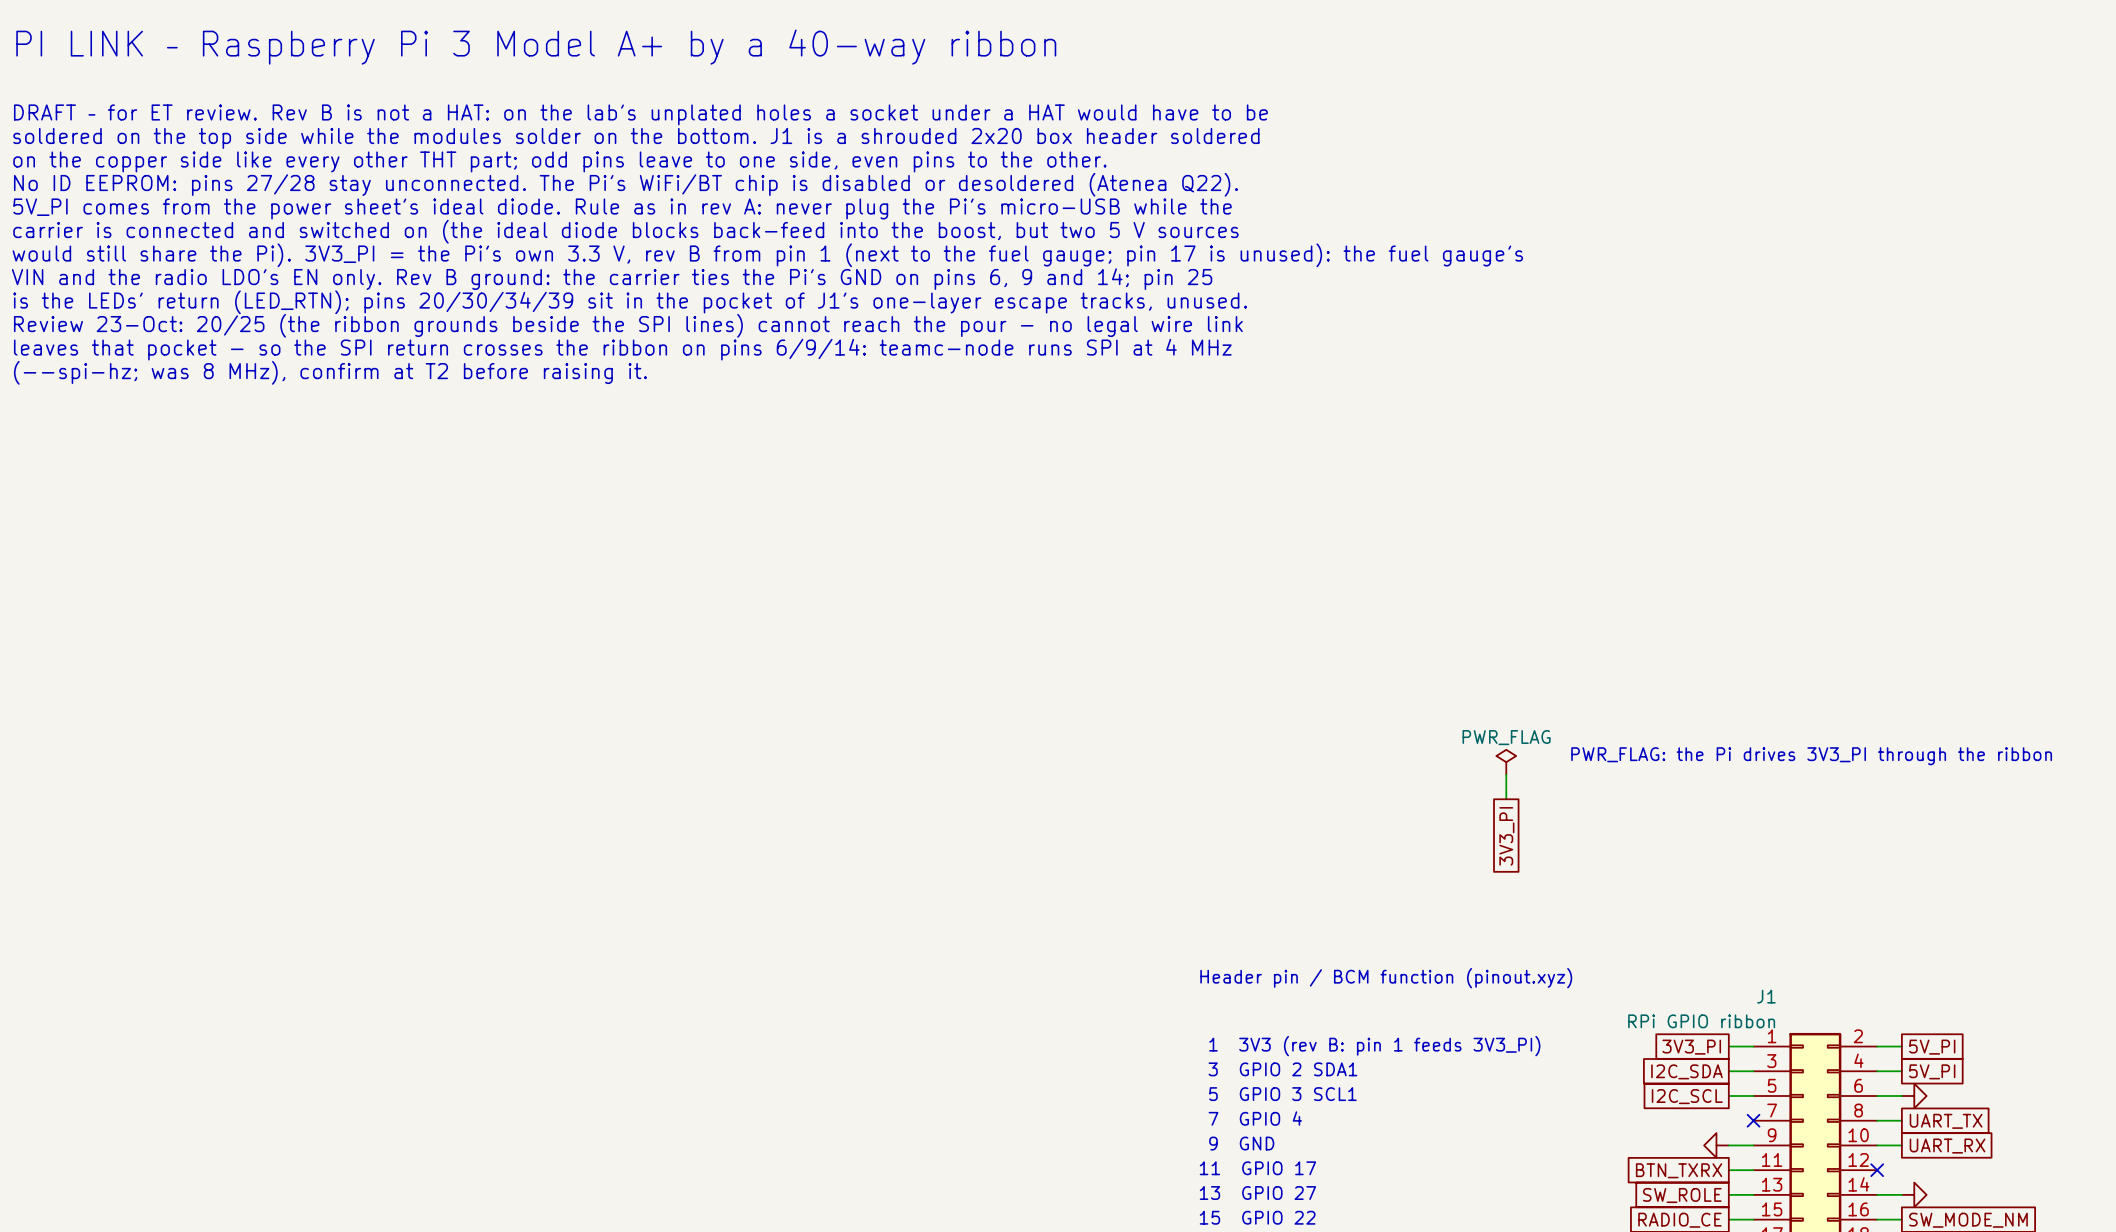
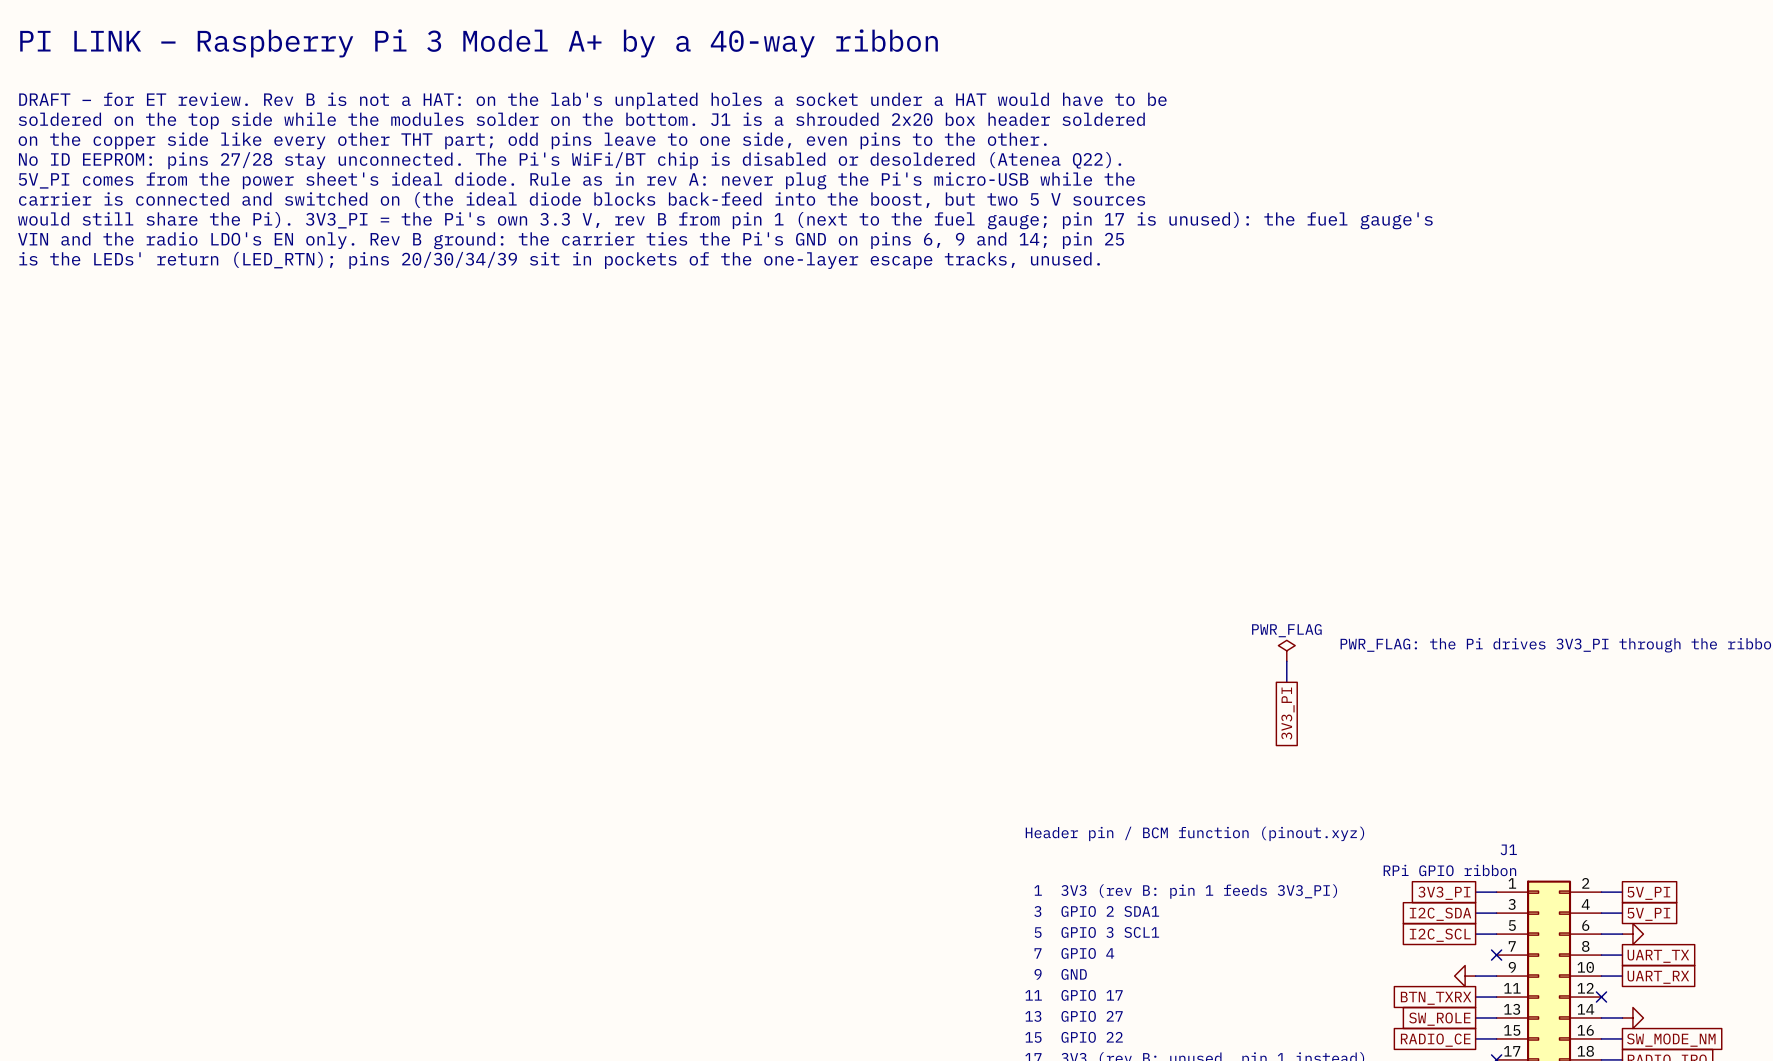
text: is the LEDs' return (LED_RTN); pins 20/30/34/39 sit in the pocket of J1's one-layer escape tracks, unused. (630, 302) -> is the LEDs' return (LED_RTN); pins 20/30/34/39 sit in pockets of the one-layer escape tracks, unused. (559, 260)
text: Review 23-Oct: 20/25 (the ribbon grounds beside the SPI lines) cannot reach the pour - no legal wire link (628, 325) -> none
text: leaves that pocket - so the SPI return crosses the ribbon on pins 6/9/14: teamc-node runs SPI at 4 MHz (622, 349) -> none
text: (--spi-hz; was 8 MHz), confirm at T2 before raising it. (330, 372) -> none

